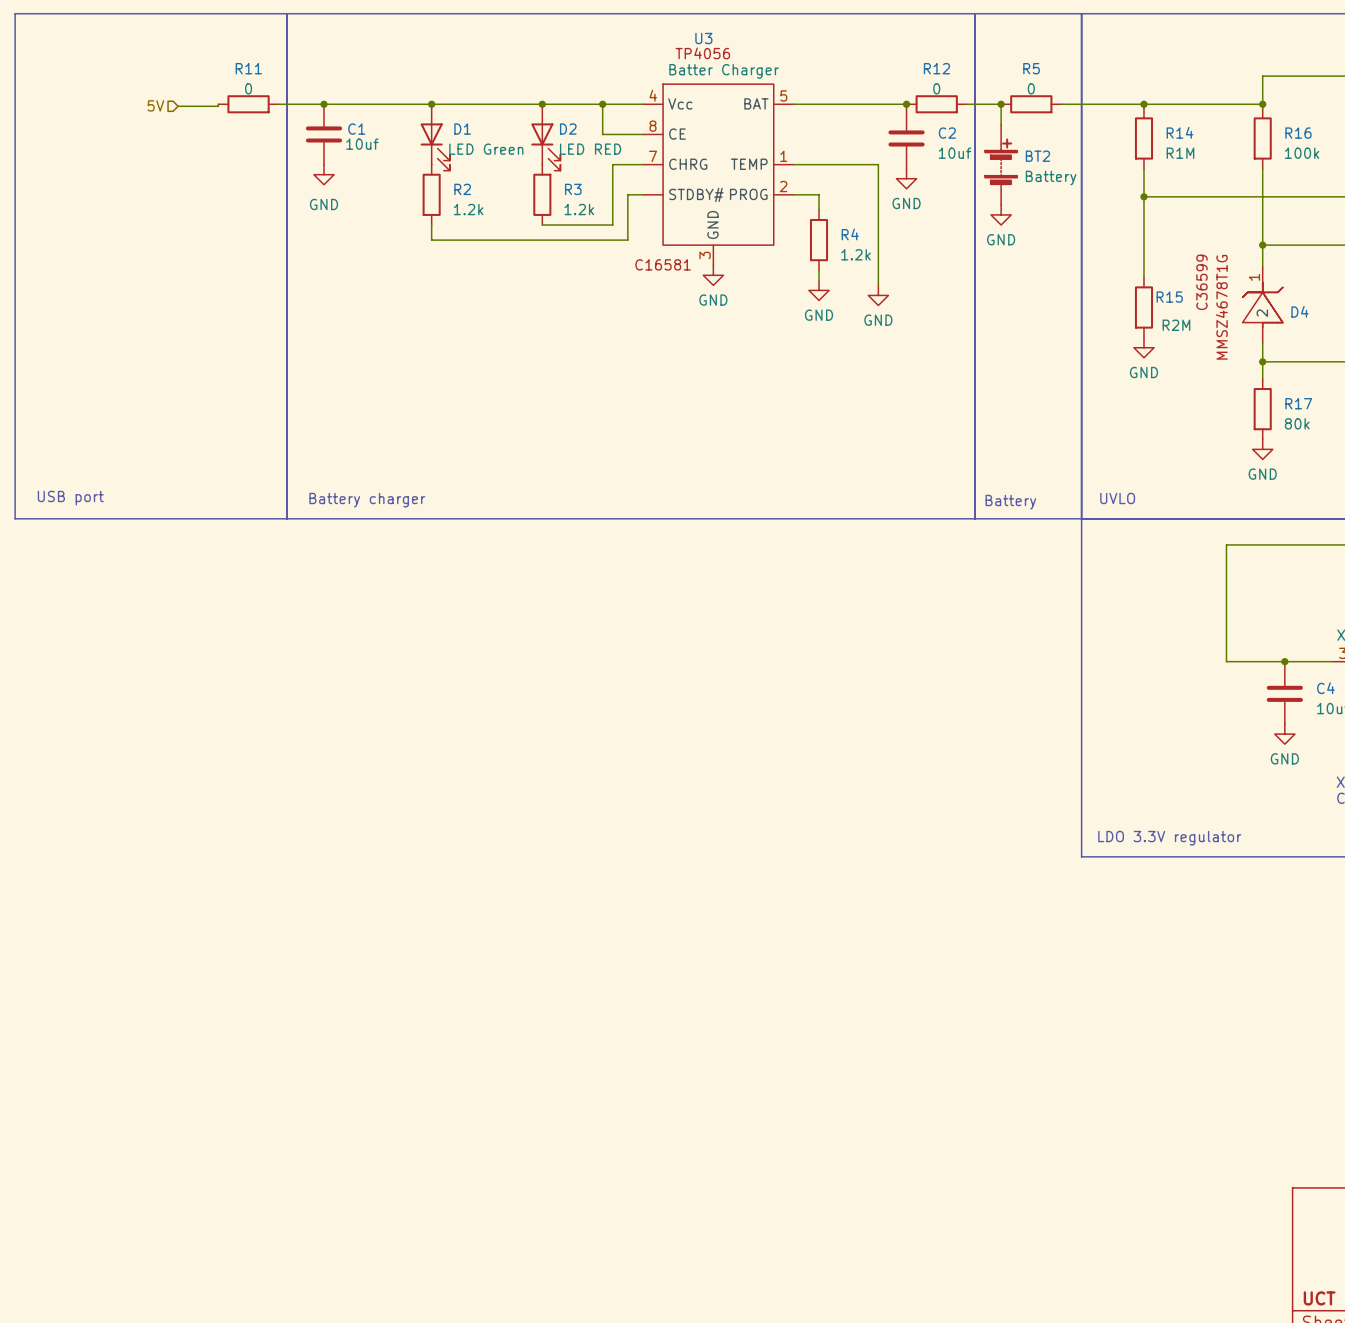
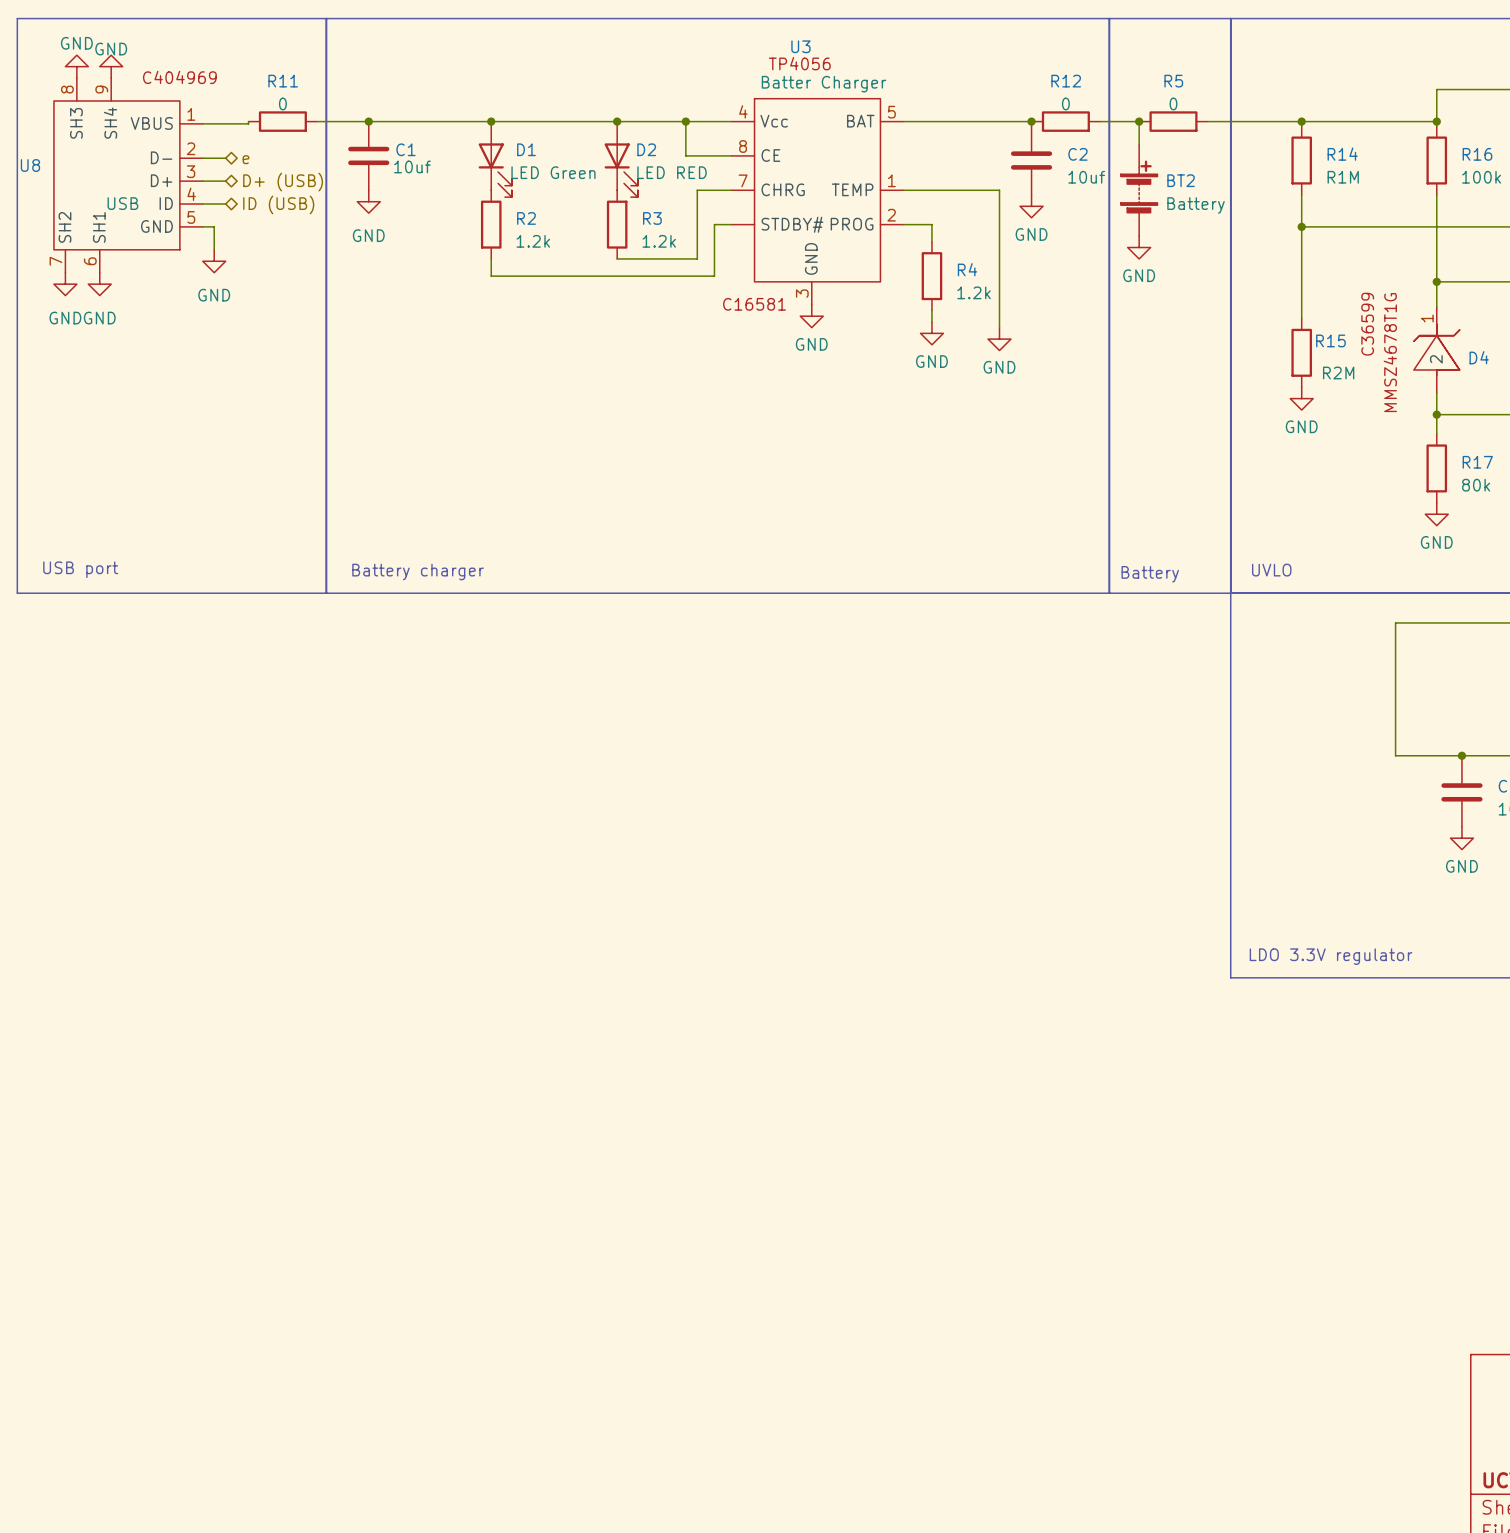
power symbol: none -> GND (76, 66)
power symbol: none -> GND (111, 66)
hierarchical label: 5V (155, 105) -> none
wire: none -> (202, 158) (225, 158)
hierarchical label: none -> e (246, 159)
U8: none -> USB (128, 175)
wire: none -> (202, 181) (225, 181)
hierarchical label: none -> D+ (USB) (283, 182)
wire: none -> (202, 204) (225, 204)
hierarchical label: none -> ID (USB) (278, 204)
wire: none -> (202, 226) (214, 226) (214, 249)
power symbol: none -> GND (214, 261)
power symbol: none -> GND (65, 284)
power symbol: none -> GND (99, 284)

